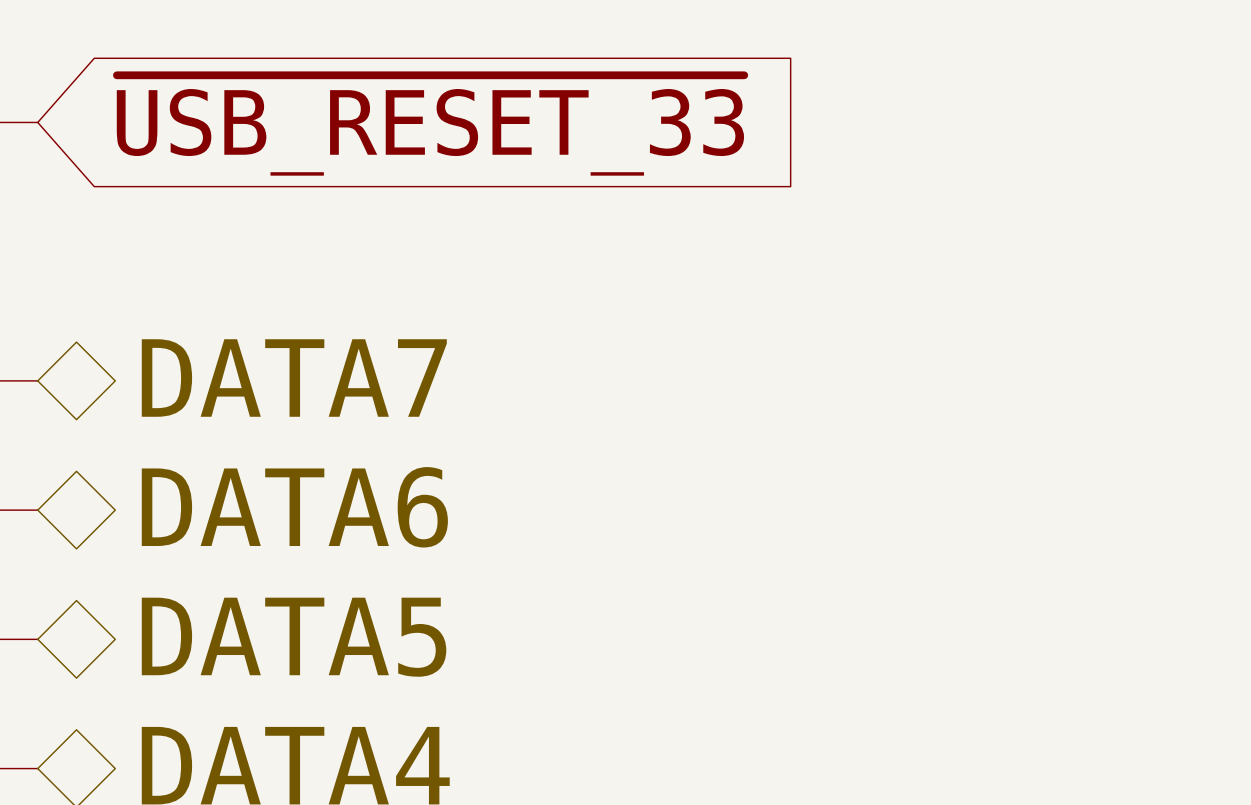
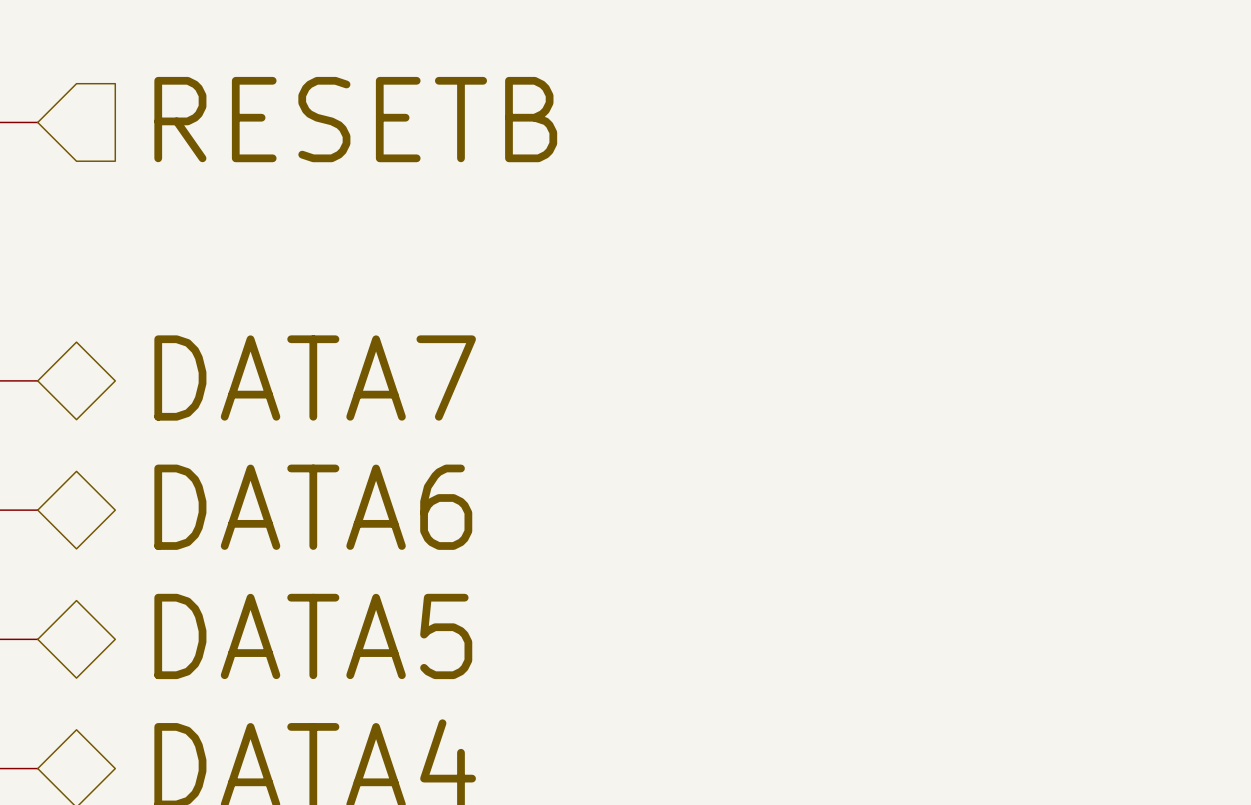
hierarchical label: none -> RESETB (355, 119)
global label: ~{USB_RESET_33} (430, 125) -> none

